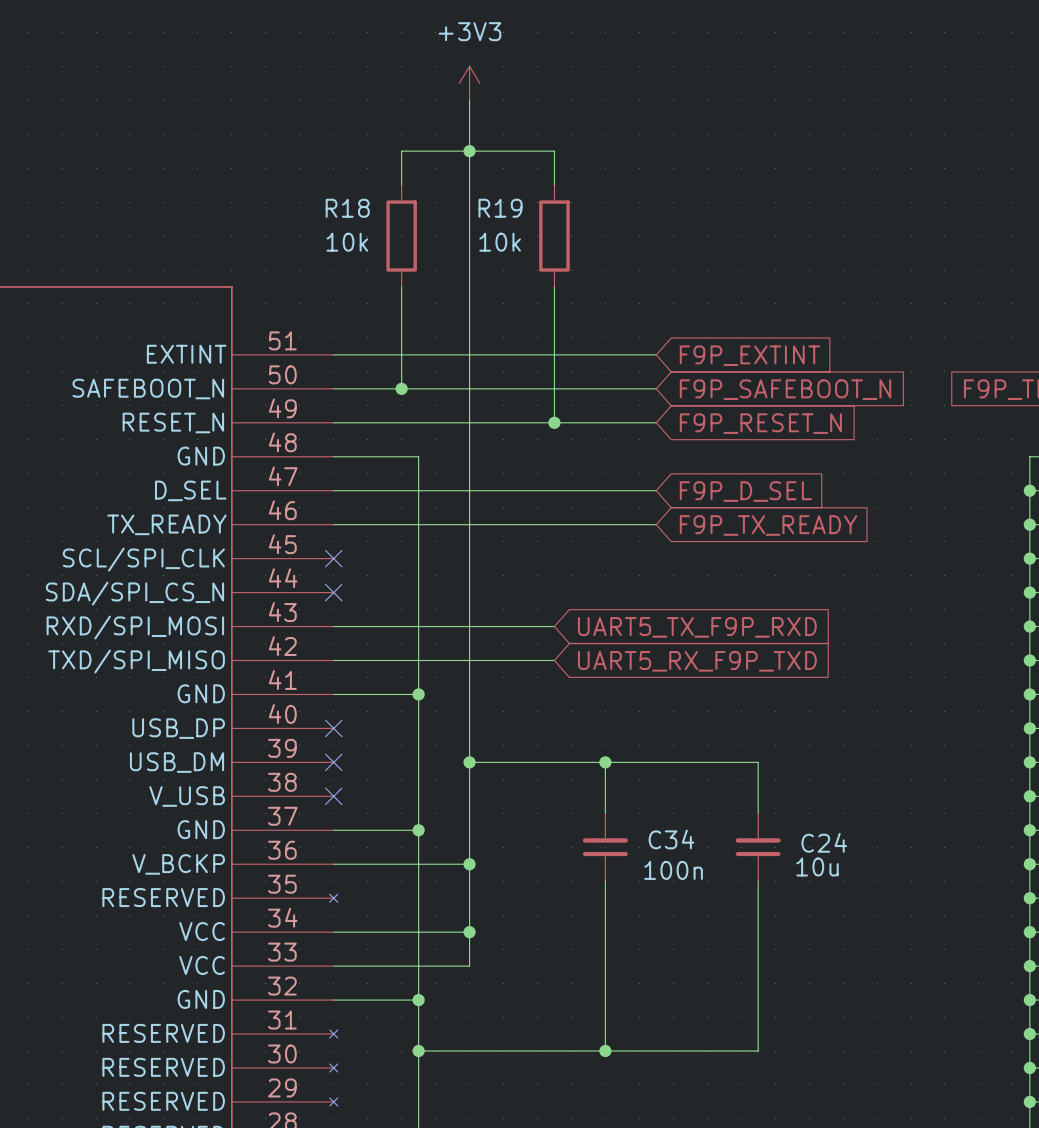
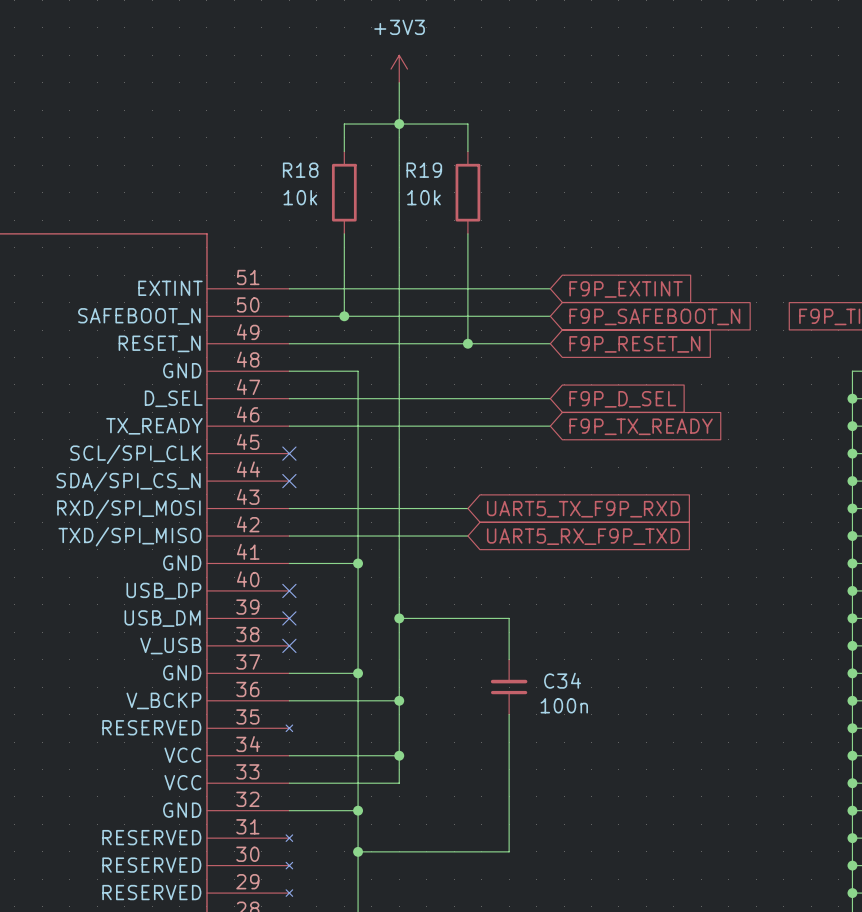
wire: (605, 762) (758, 762) (758, 813) -> none
junction: (605, 762) -> none
C24: 10u (758, 847) -> none
wire: (758, 881) (758, 1051) (605, 1051) -> none
junction: (605, 1051) -> none

